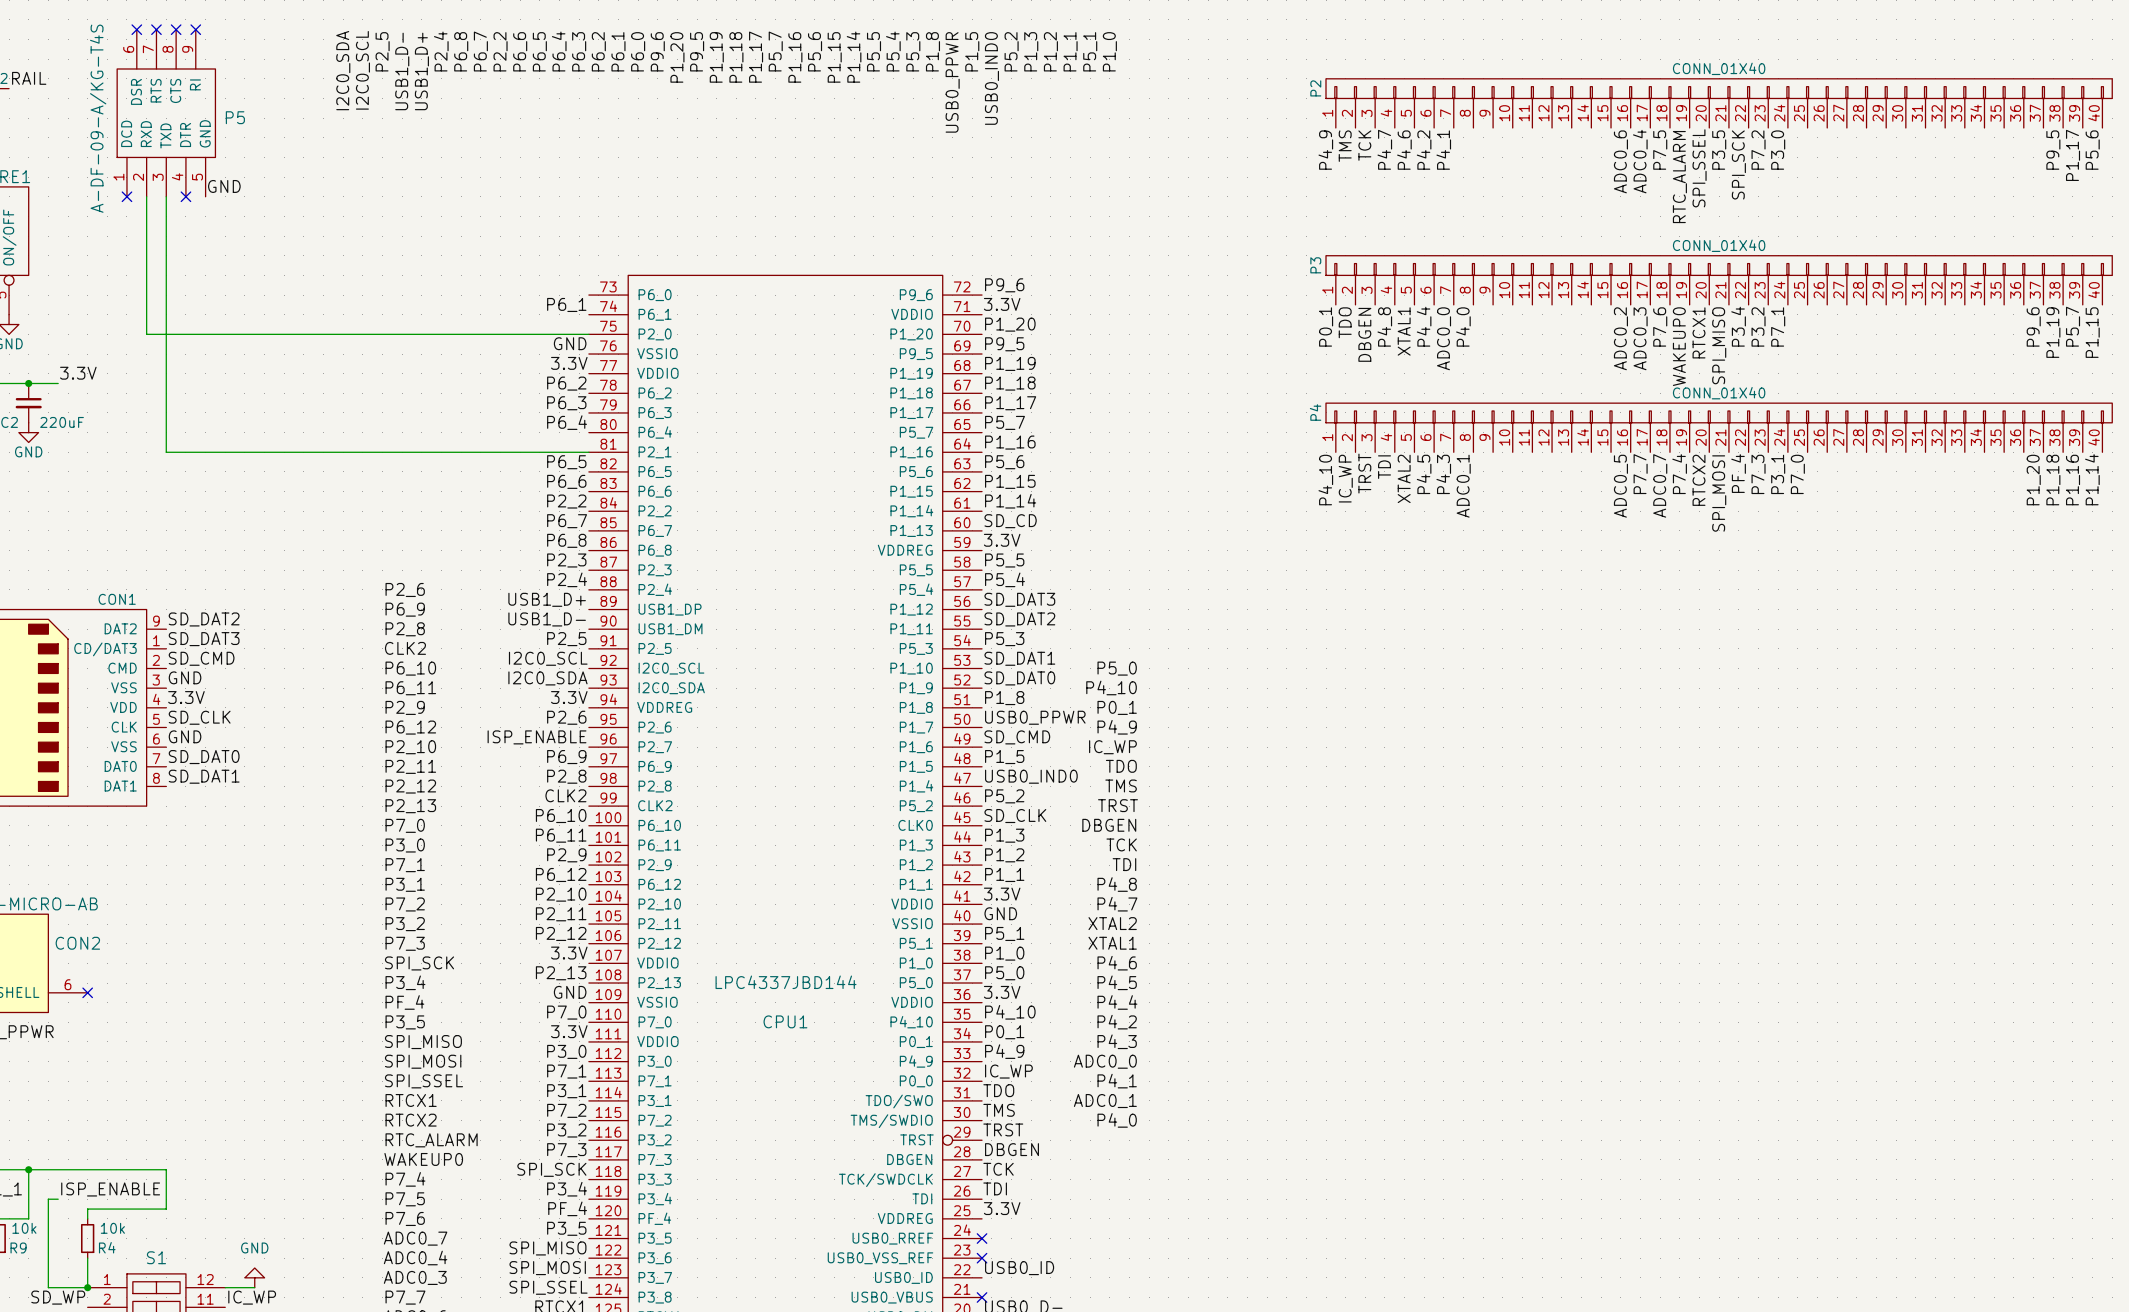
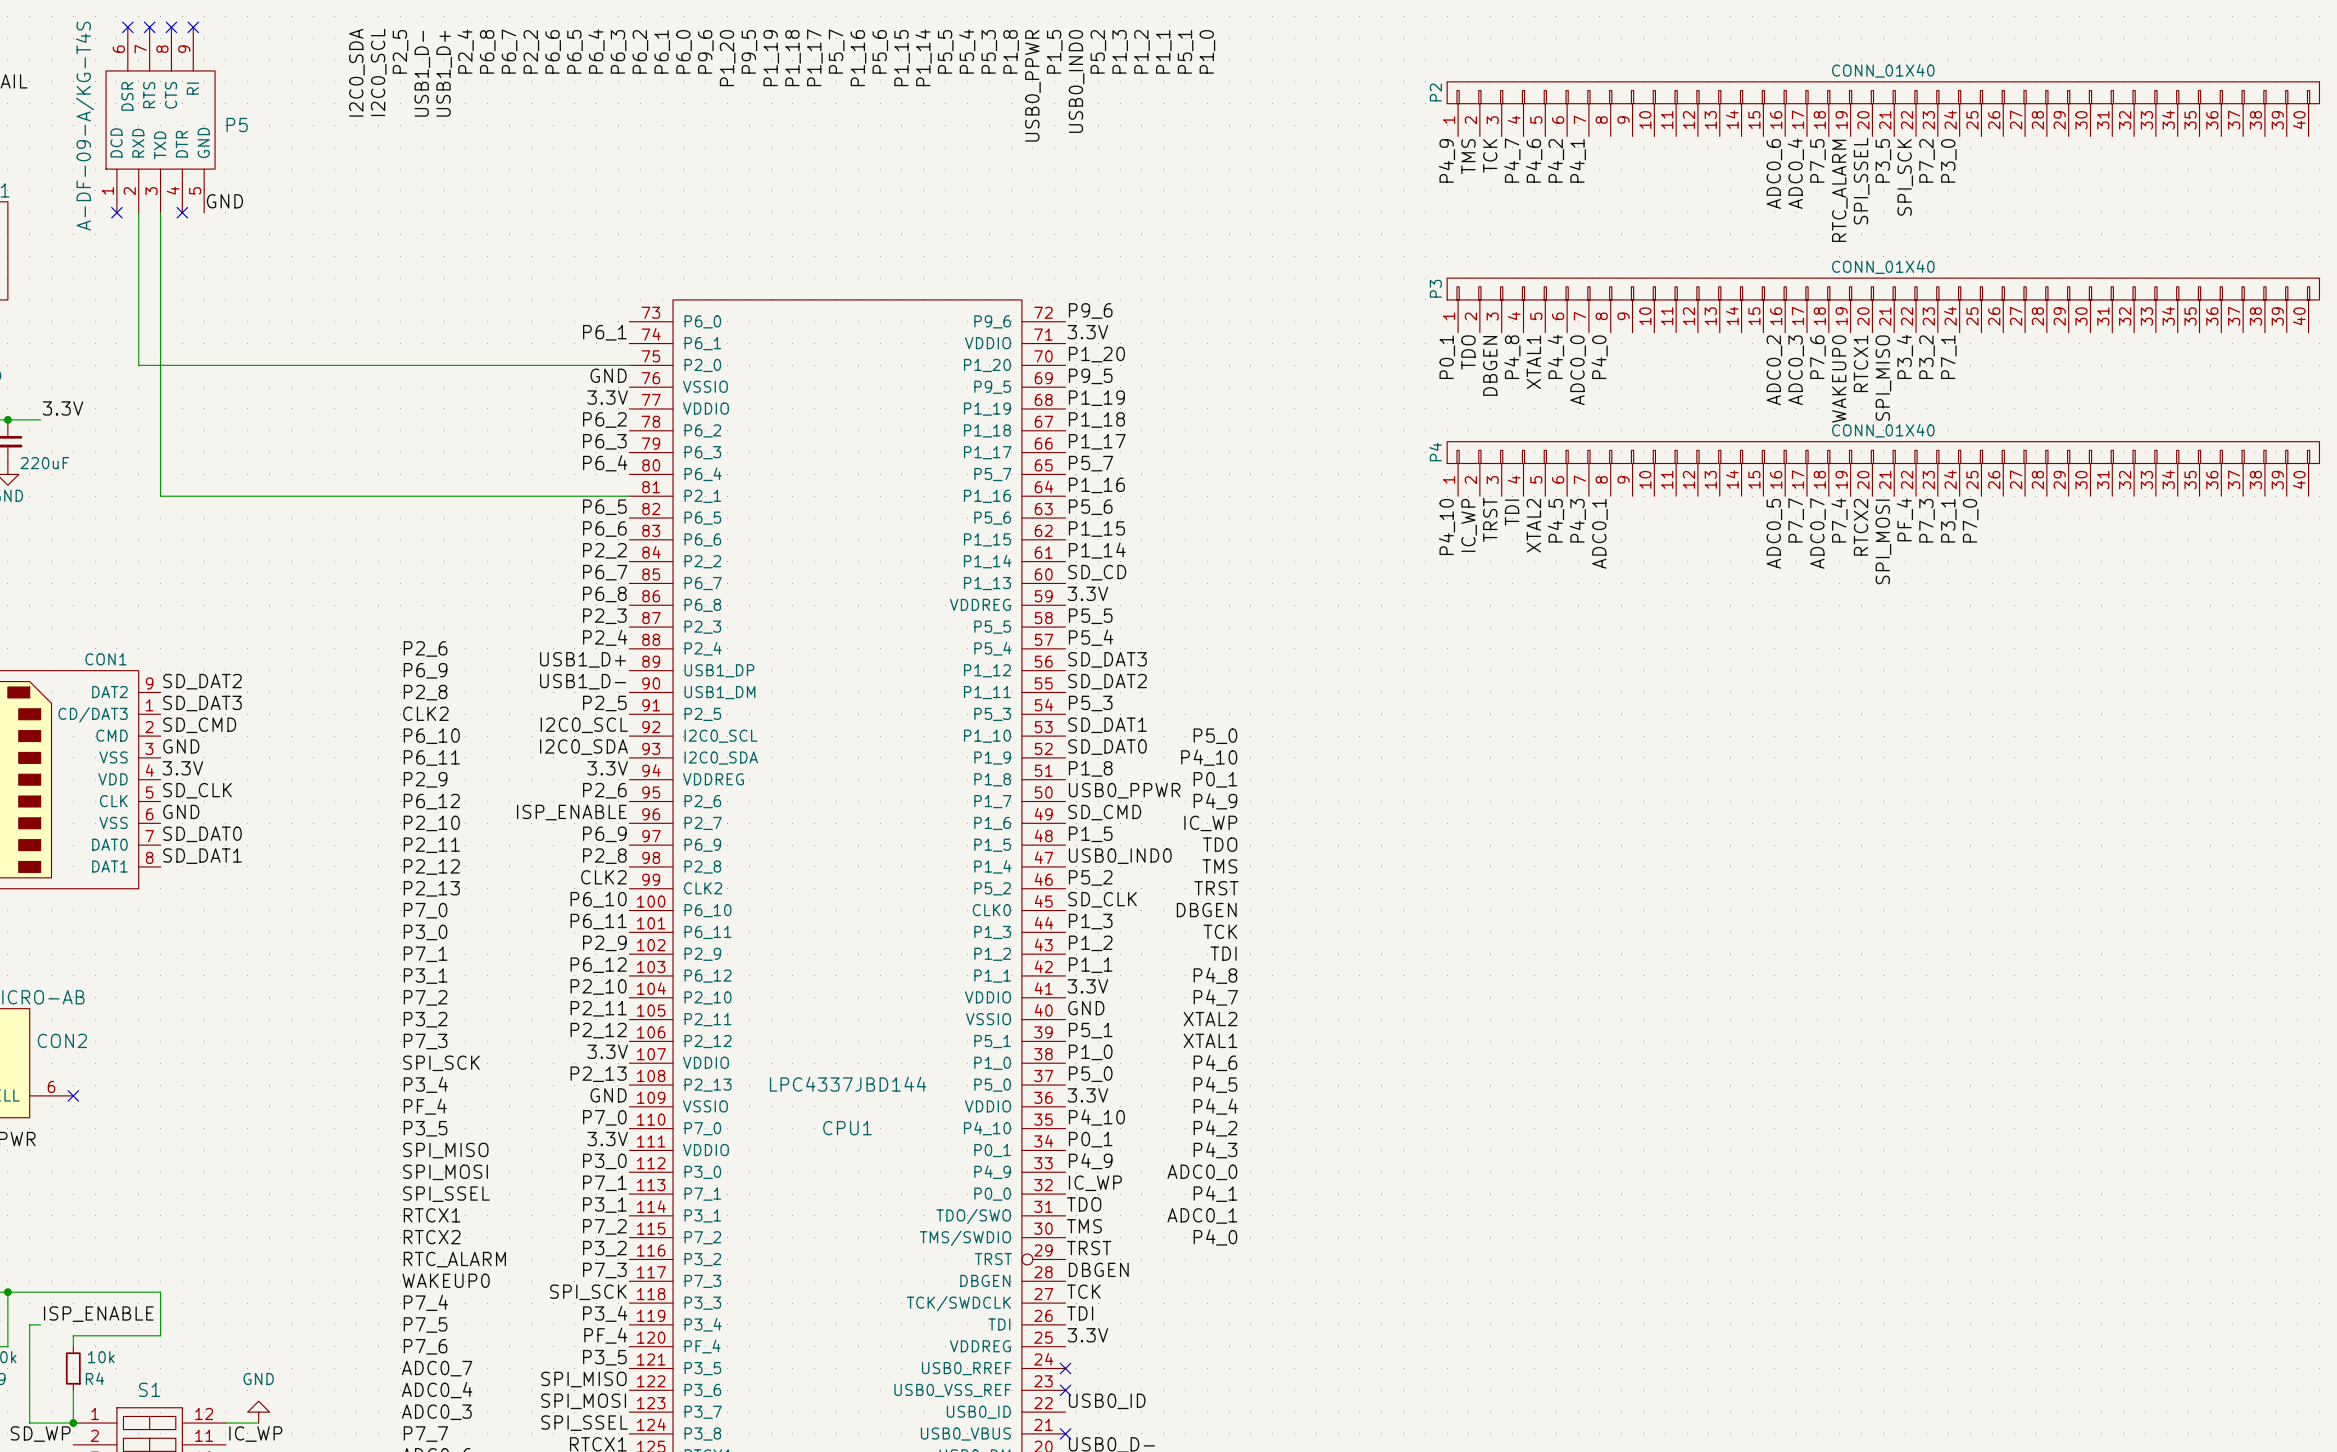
label: P9_5 (2053, 150) -> none
label: P5_6 (2092, 150) -> none
label: P1_17 (2073, 155) -> none
label: P9_6 (2033, 326) -> none
label: P5_7 (2073, 326) -> none
label: P1_19 (2053, 332) -> none
label: P1_15 (2092, 332) -> none
label: P1_14 (2092, 479) -> none
label: P1_20 (2033, 480) -> none
label: P1_18 (2053, 480) -> none
label: P1_16 (2073, 480) -> none

